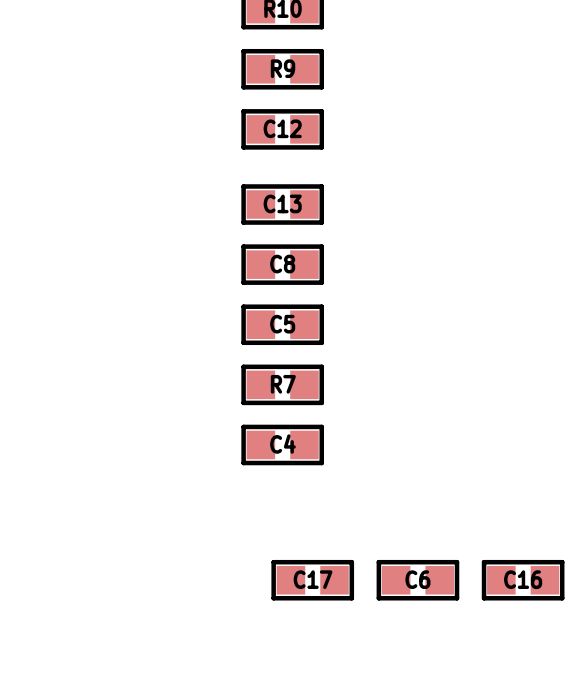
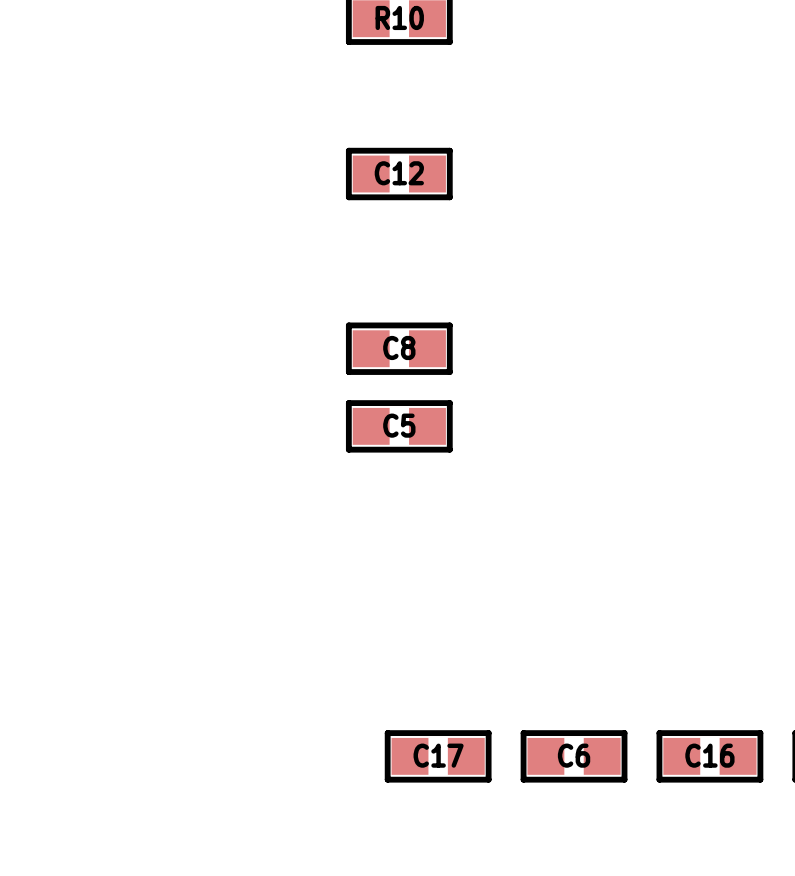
R9: (282, 69) -> none
C13: (282, 204) -> none
R7: (282, 384) -> none
C4: (282, 444) -> none

